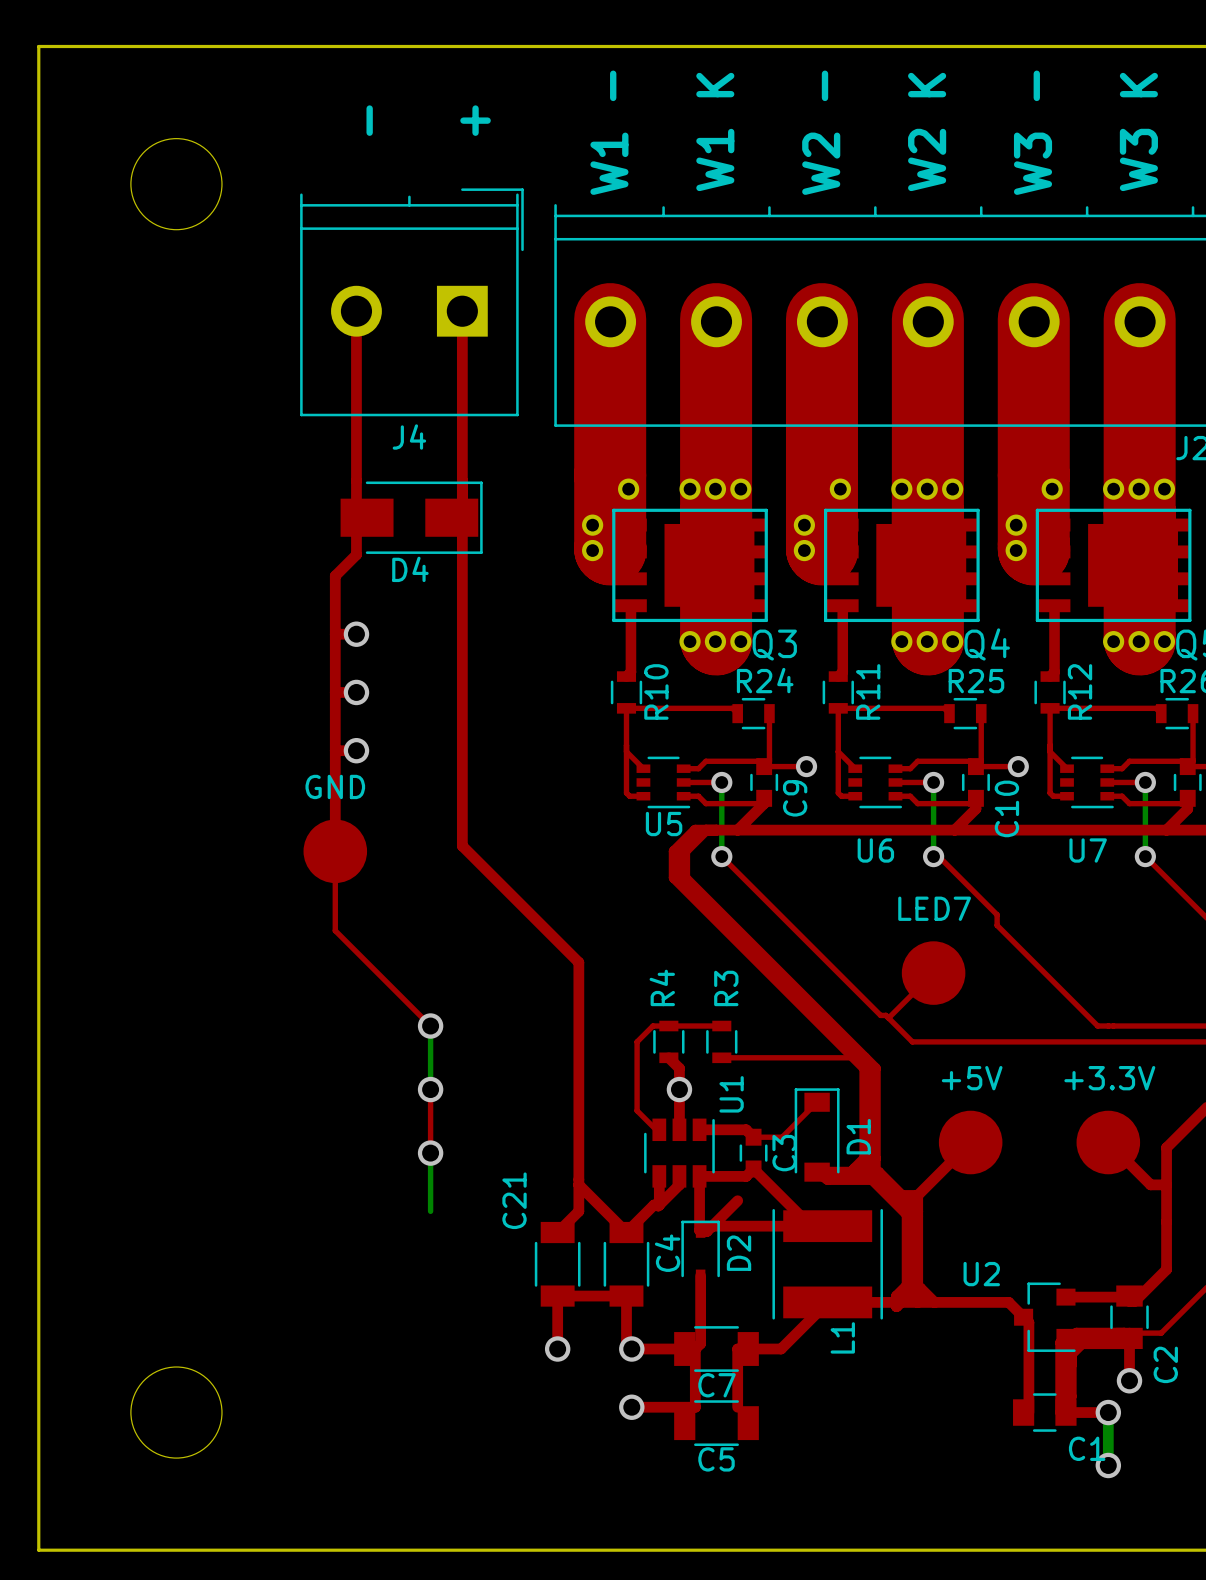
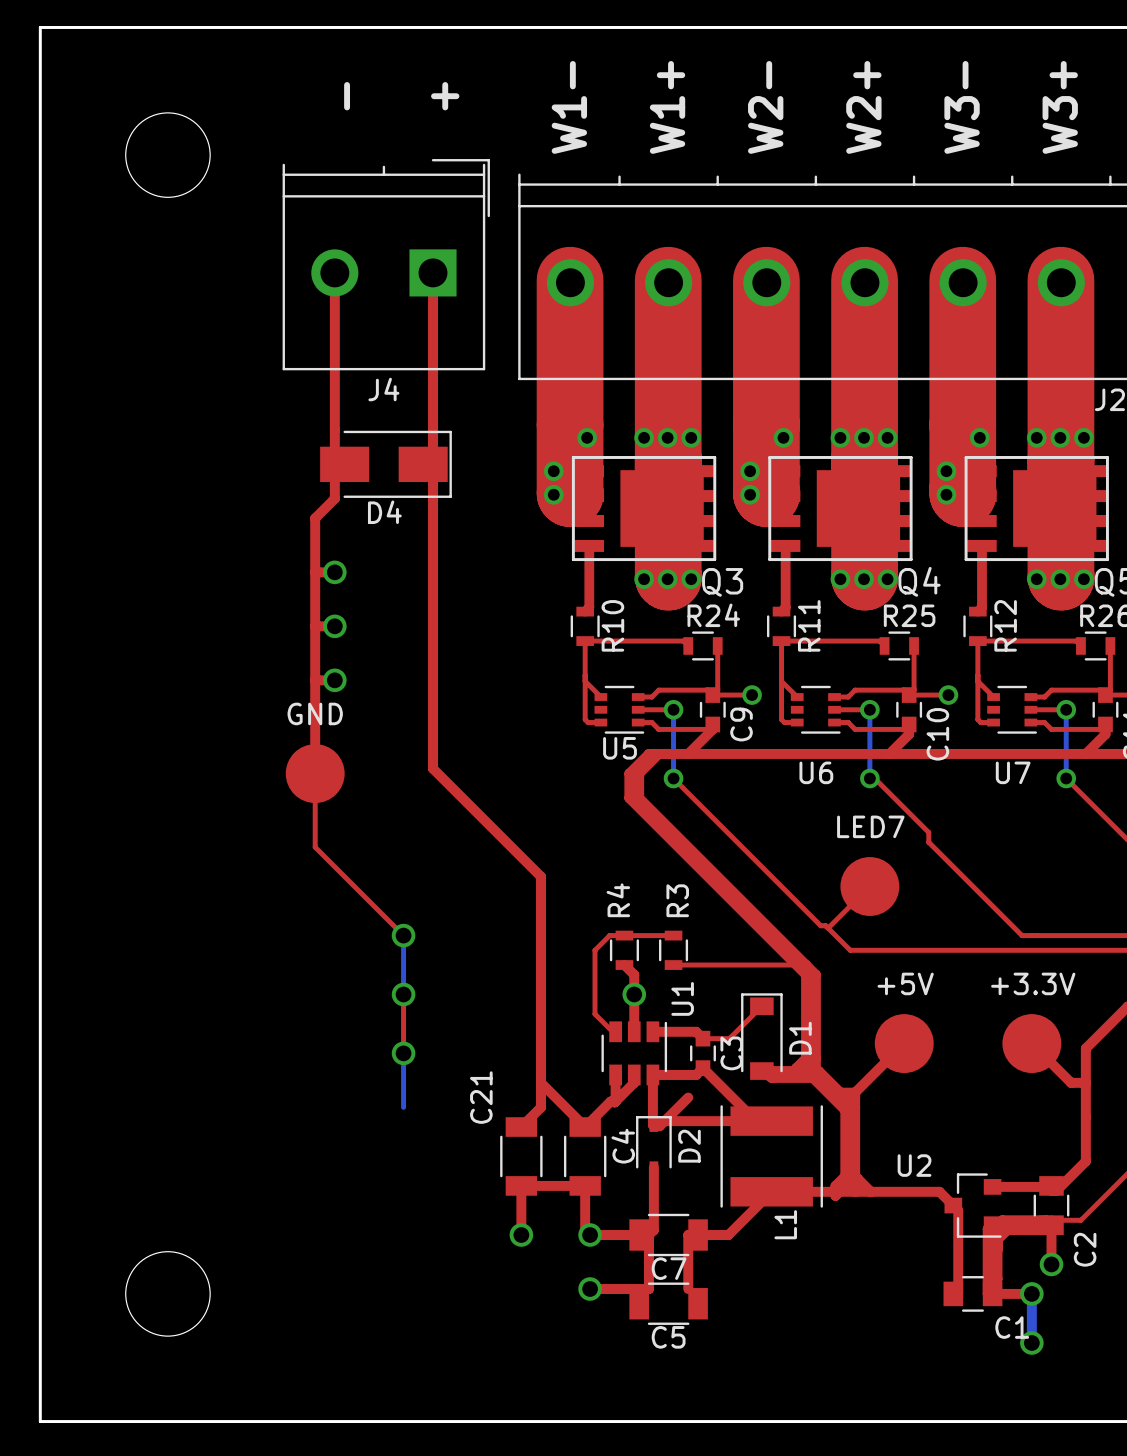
text: W1 K (715, 131) -> W1+ (667, 107)
text: W2 K (927, 131) -> W2+ (863, 107)
text: W3 K (1138, 131) -> W3+ (1060, 107)
text: W1 - (609, 132) -> W1- (569, 107)
text: W2 - (821, 132) -> W2- (765, 107)
text: W3 - (1033, 132) -> W3- (962, 107)

